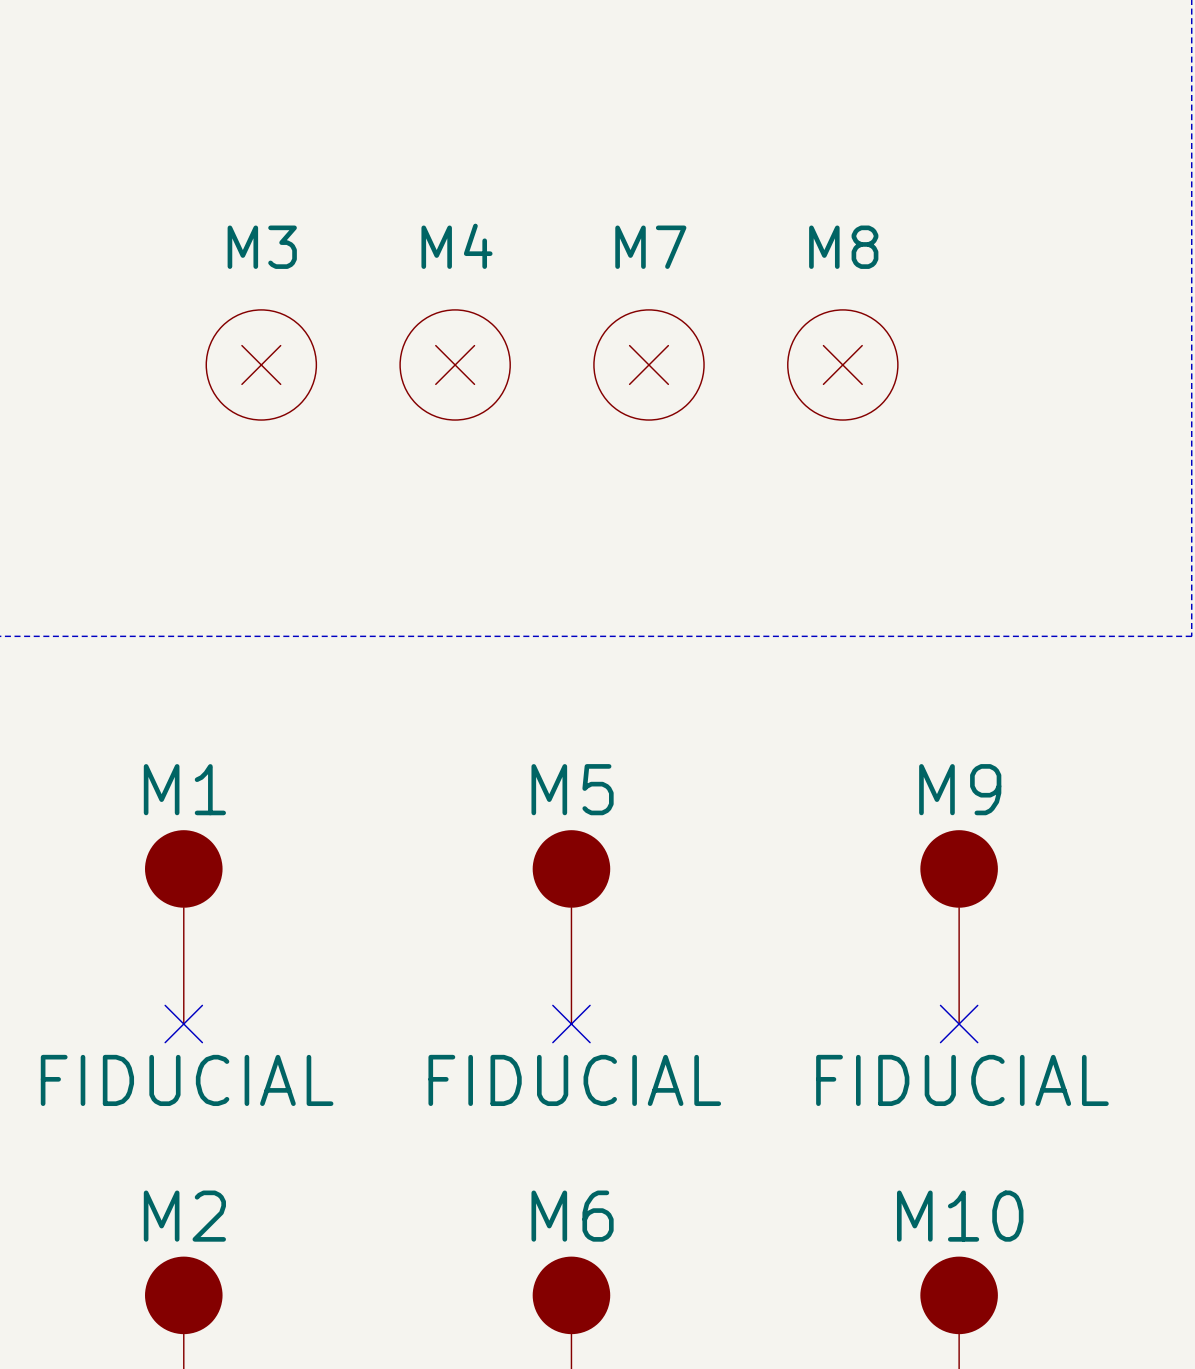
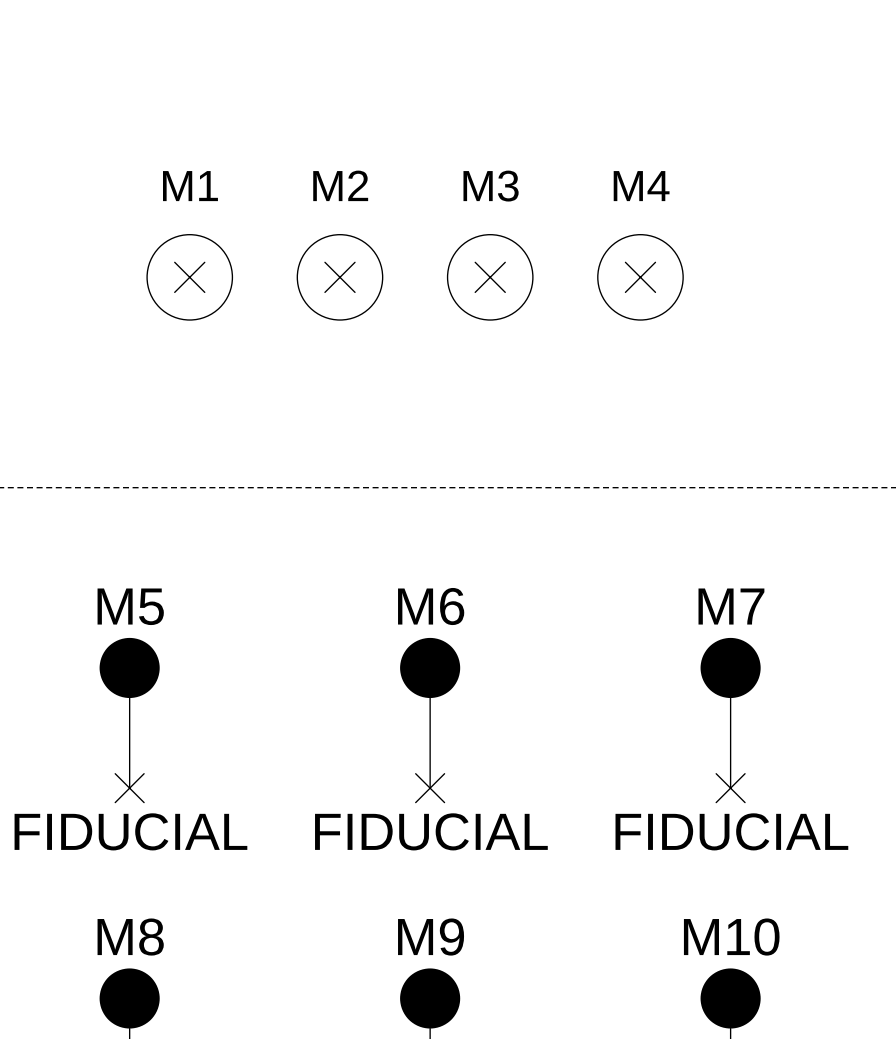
M4 name: M4 (456, 246) -> M2 (340, 185)
M3 name: M3 (262, 247) -> M1 (190, 186)
M7 name: M7 (650, 247) -> M3 (491, 186)
M8 name: M8 (843, 247) -> M4 (641, 186)
M1 name: M1 (184, 789) -> M5 (130, 606)
M5 name: M5 (572, 789) -> M6 (431, 606)
M9 name: M9 (960, 789) -> M7 (731, 606)
M2 name: M2 (184, 1216) -> M8 (130, 937)
M6 name: M6 (572, 1216) -> M9 (431, 937)

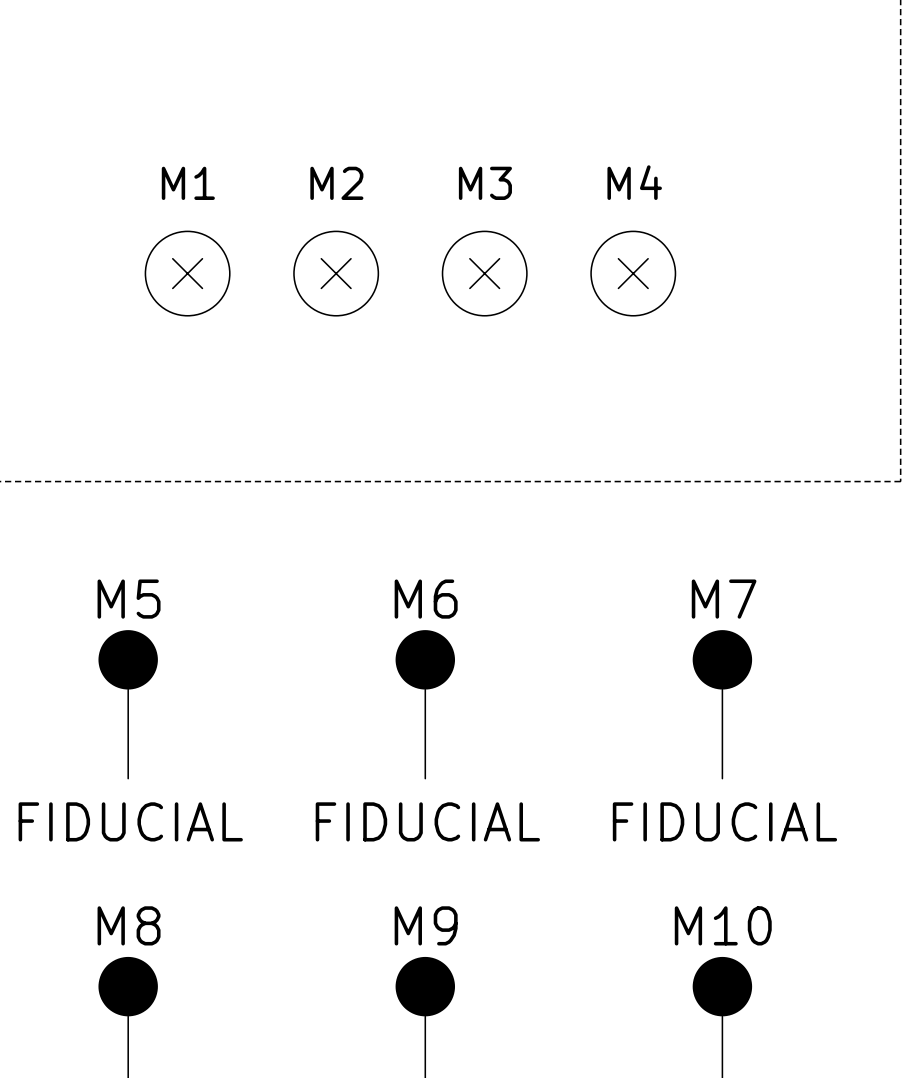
no-connect mark: (129, 788) -> none
no-connect mark: (430, 788) -> none
no-connect mark: (730, 788) -> none

